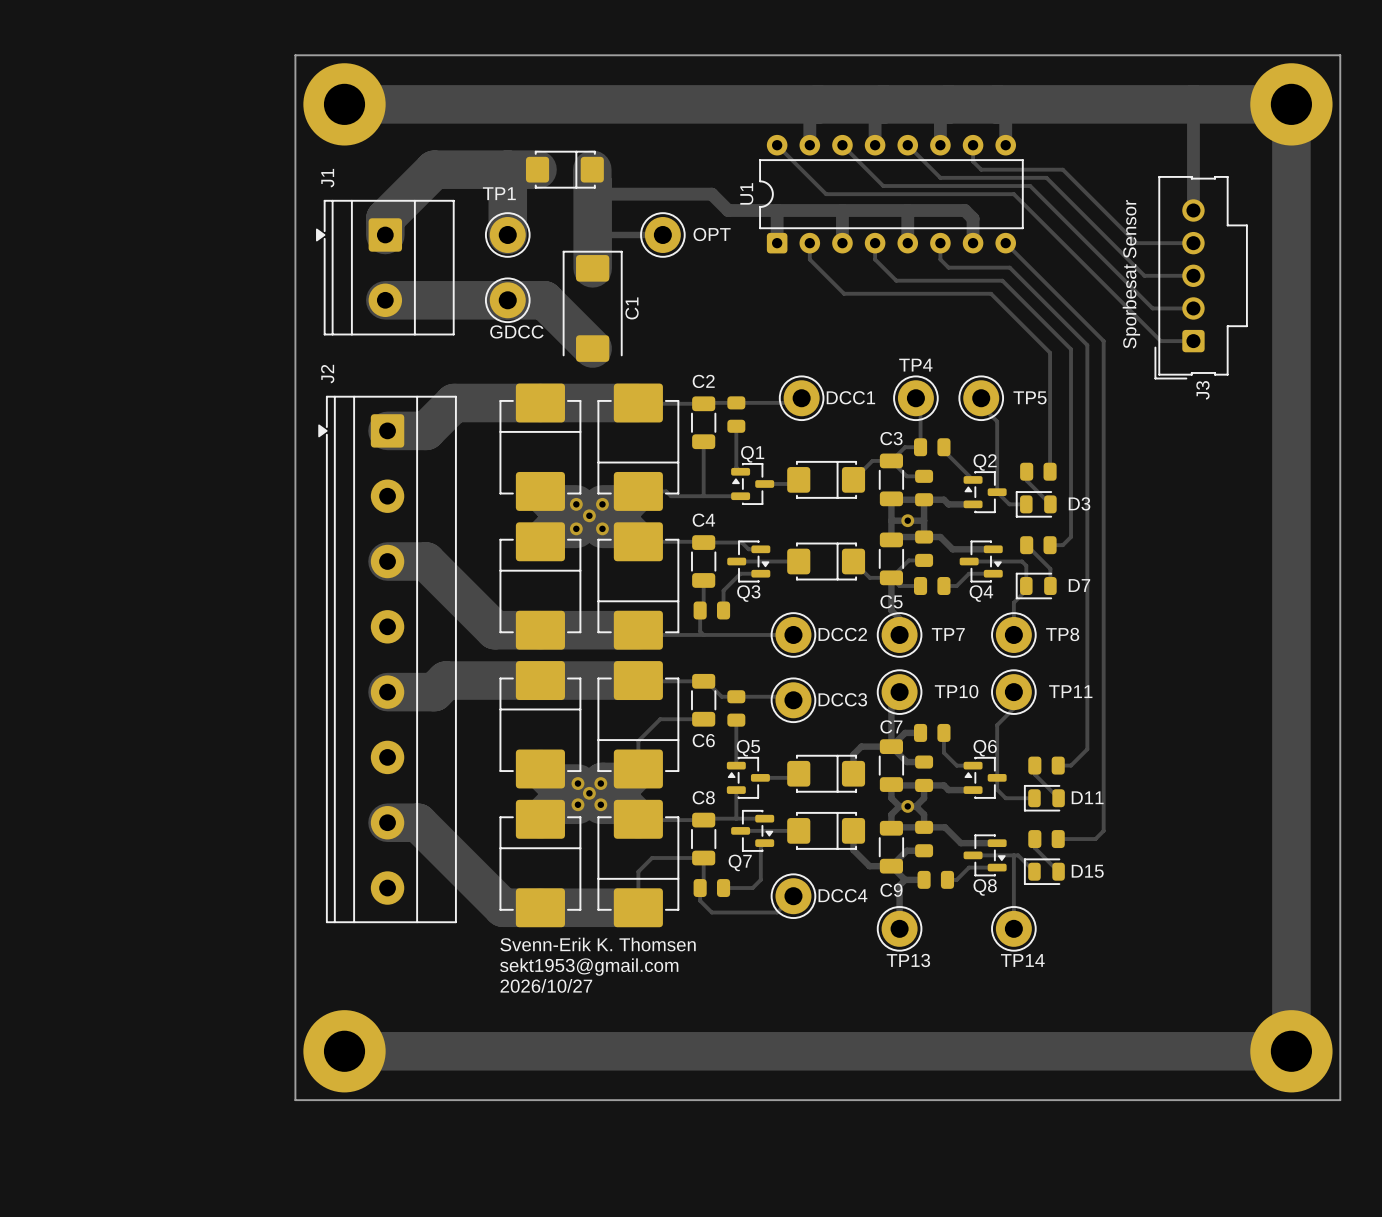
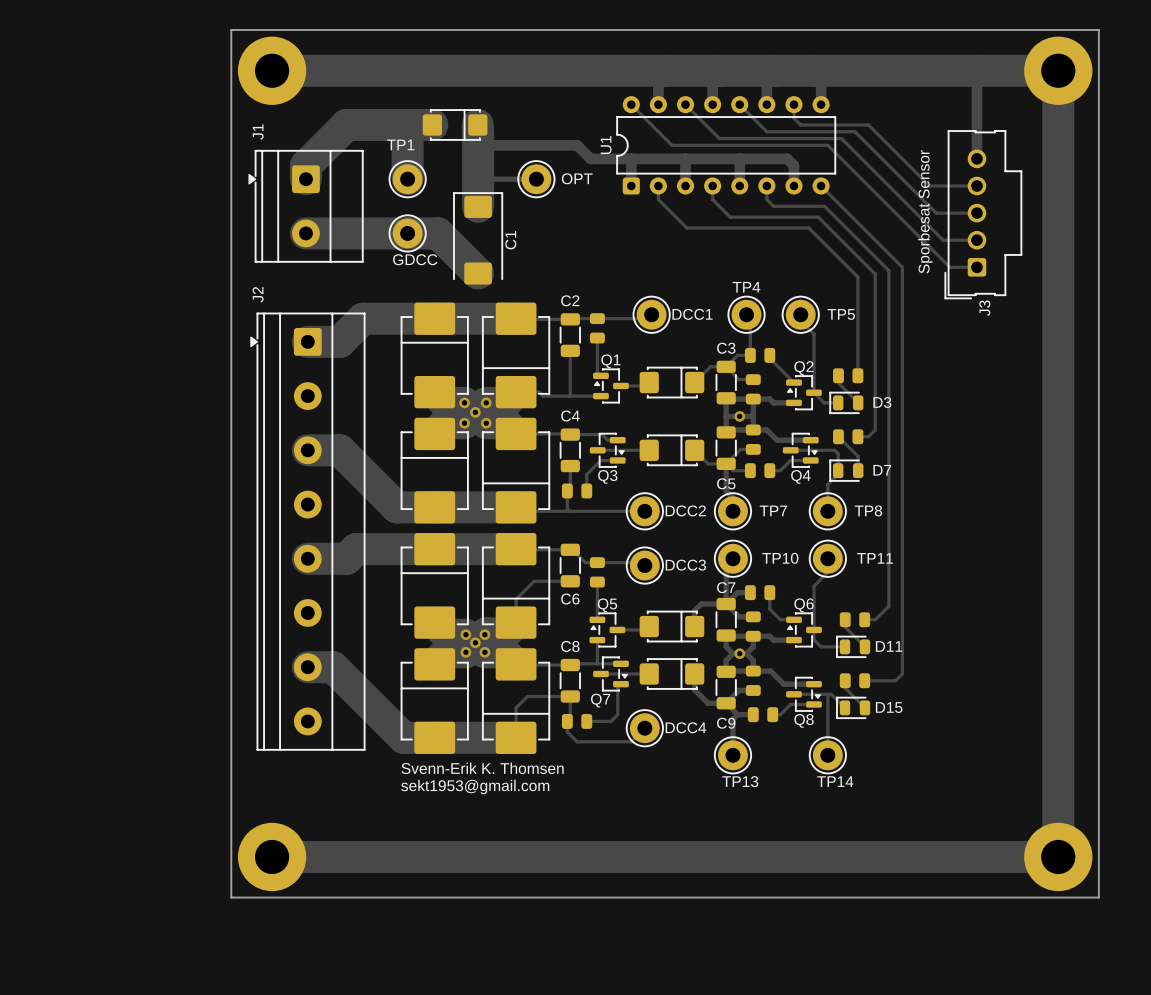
text: 2026/10/27 (546, 985) -> none

